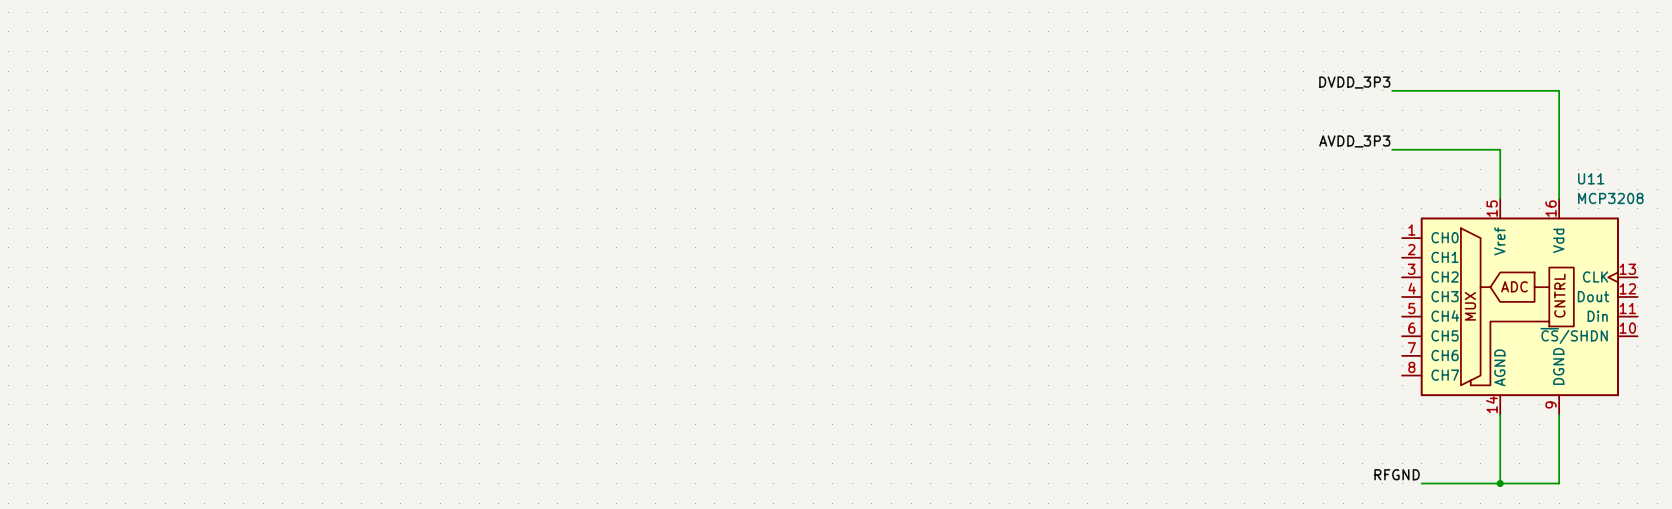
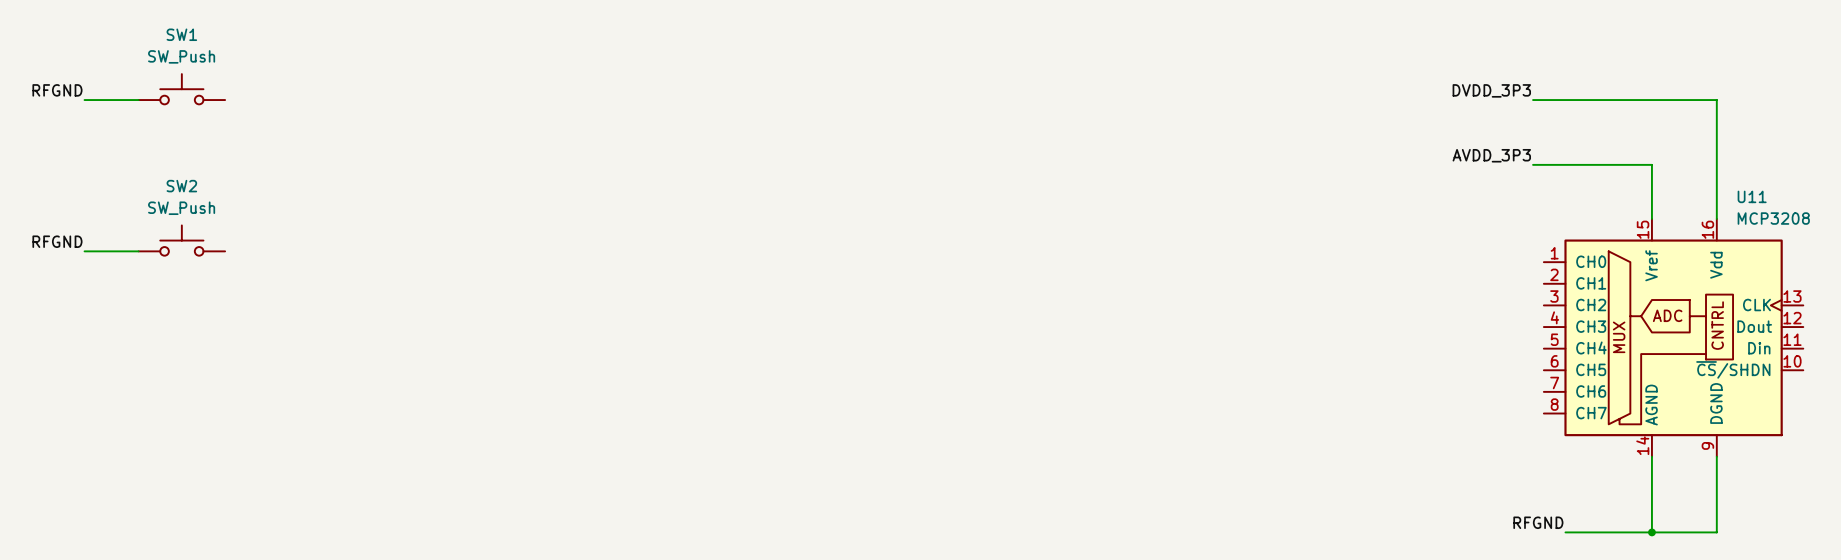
SW1: none -> SW_Push (181, 89)
label: none -> RFGND (57, 90)
wire: none -> (84, 100) (138, 100)
SW2: none -> SW_Push (181, 240)
label: none -> RFGND (57, 241)
wire: none -> (84, 251) (138, 251)

